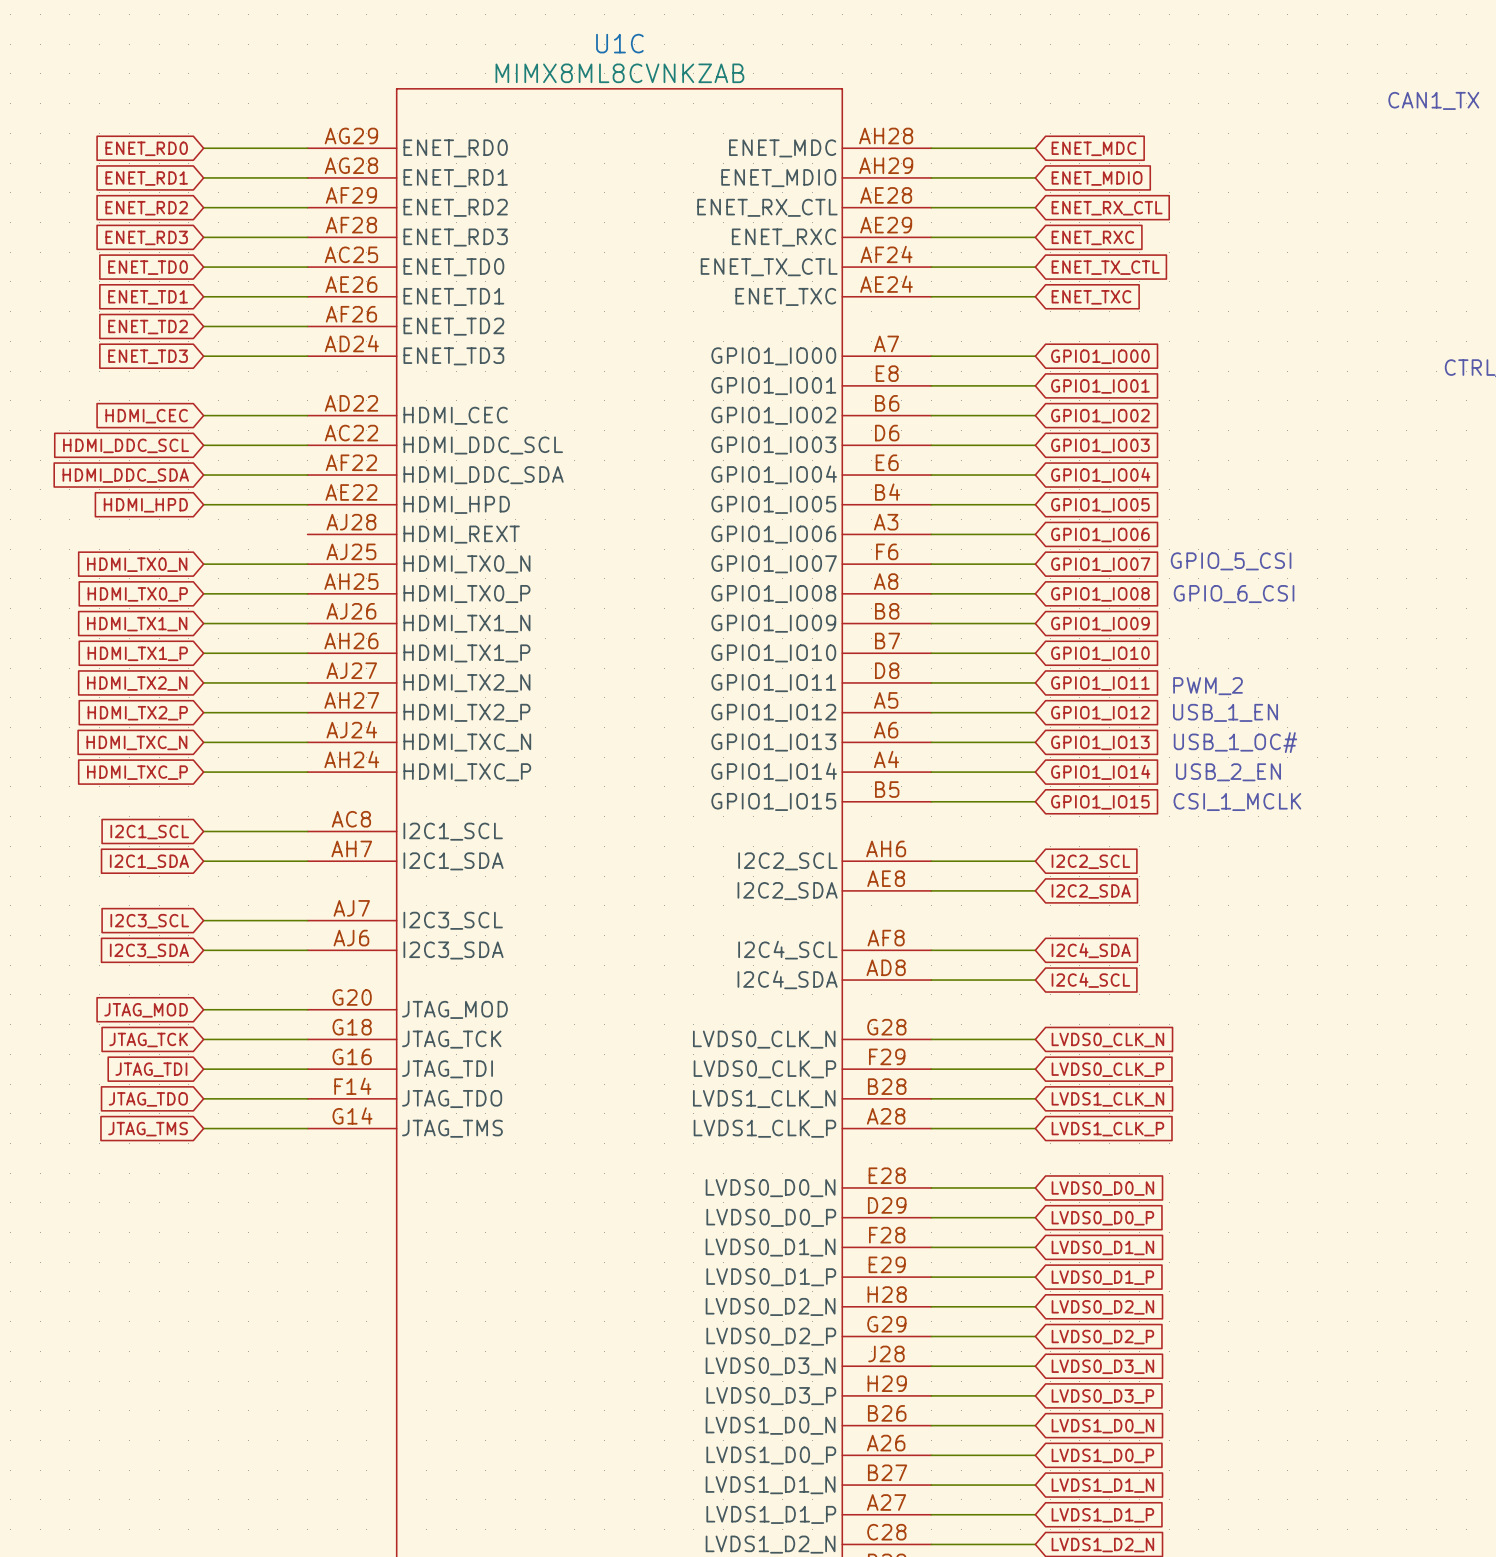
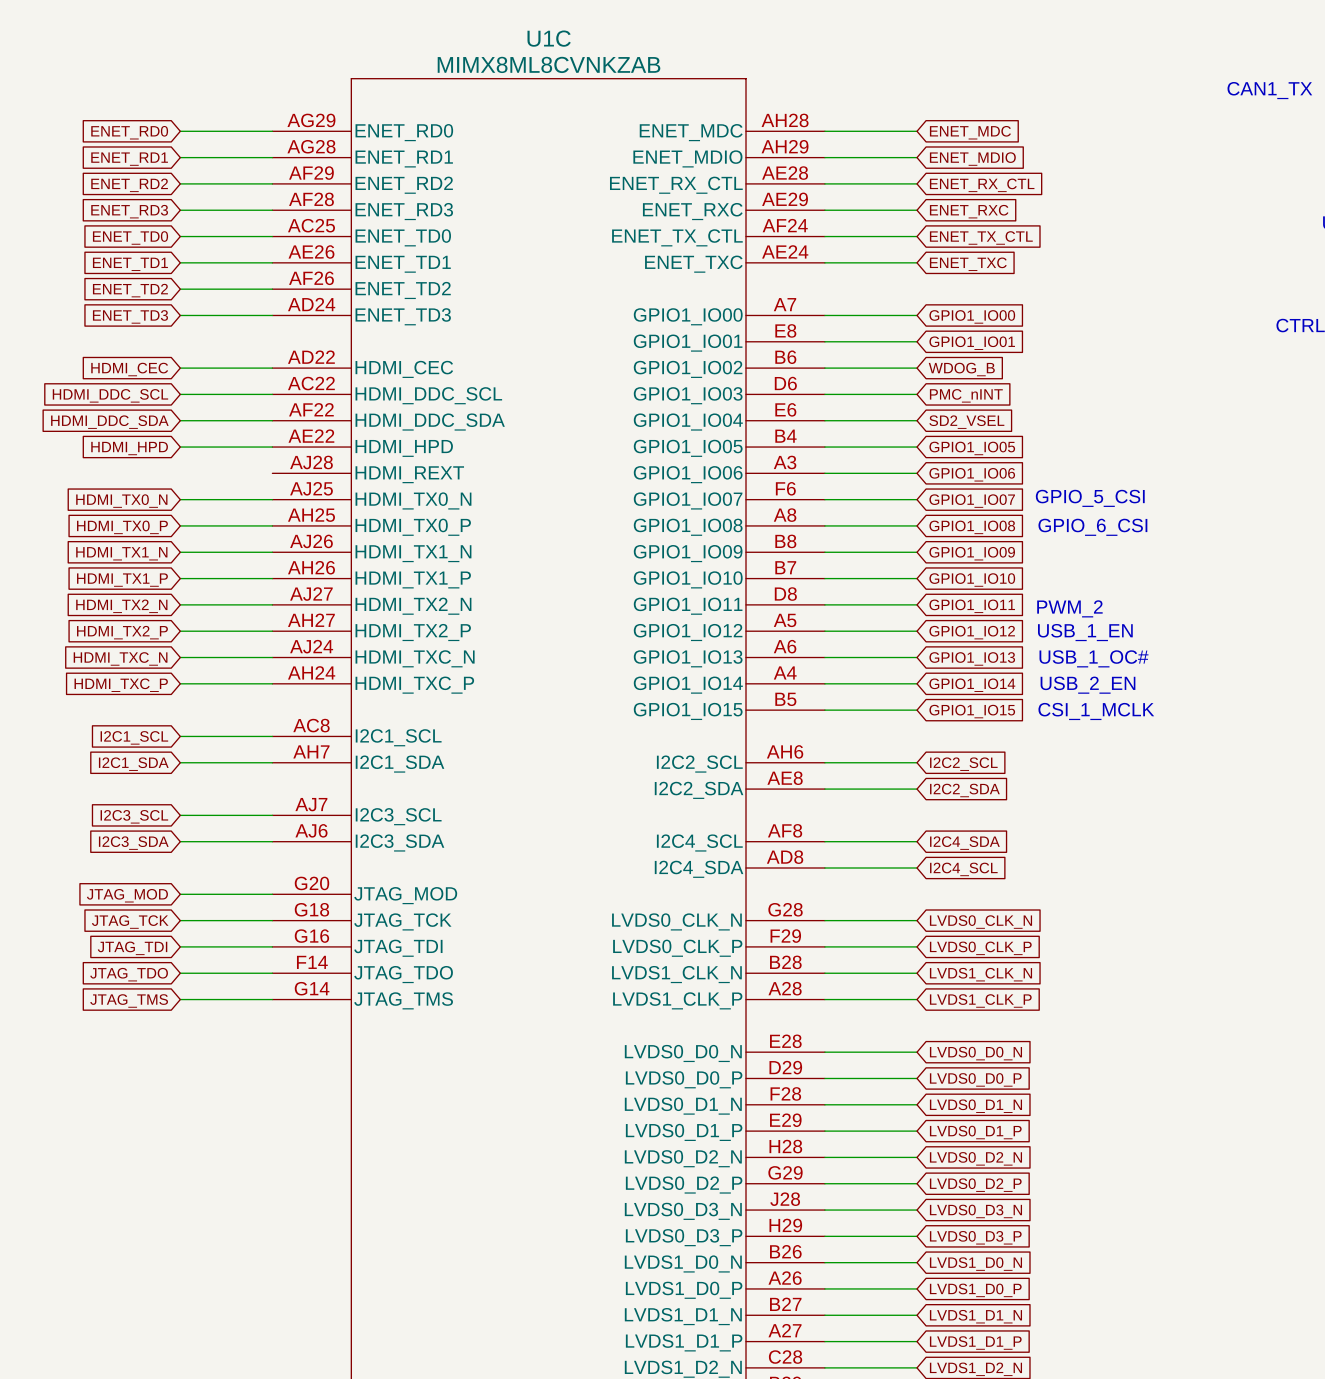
global label: GPIO1_IO02 (1100, 416) -> WDOG_B (961, 369)
global label: GPIO1_IO03 (1100, 445) -> PMC_nINT (966, 395)
global label: GPIO1_IO04 (1100, 475) -> SD2_VSEL (966, 422)

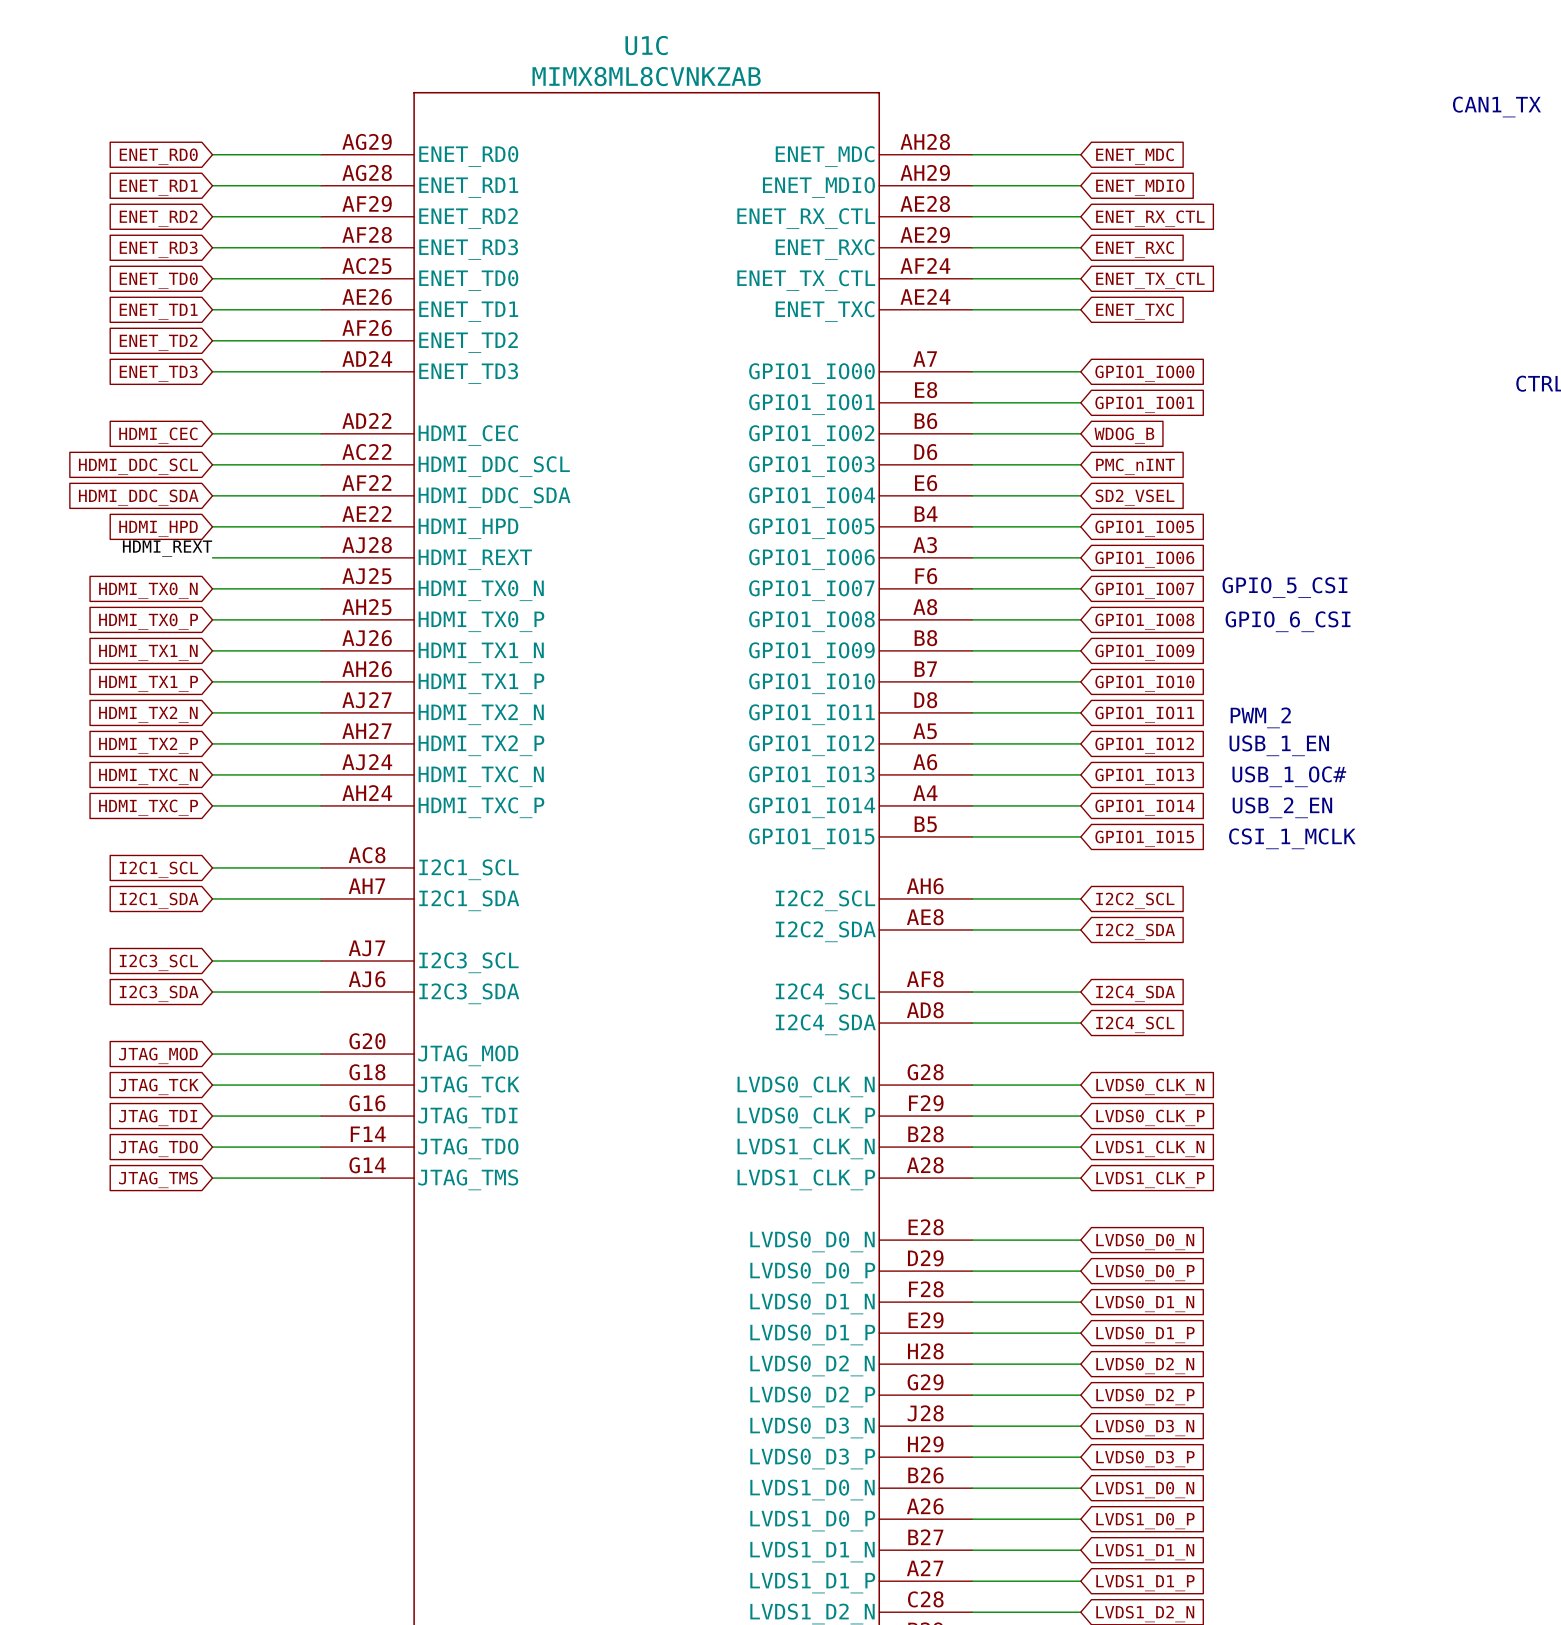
label: none -> HDMI_REXT (167, 548)
wire: none -> (212, 557) (321, 557)

